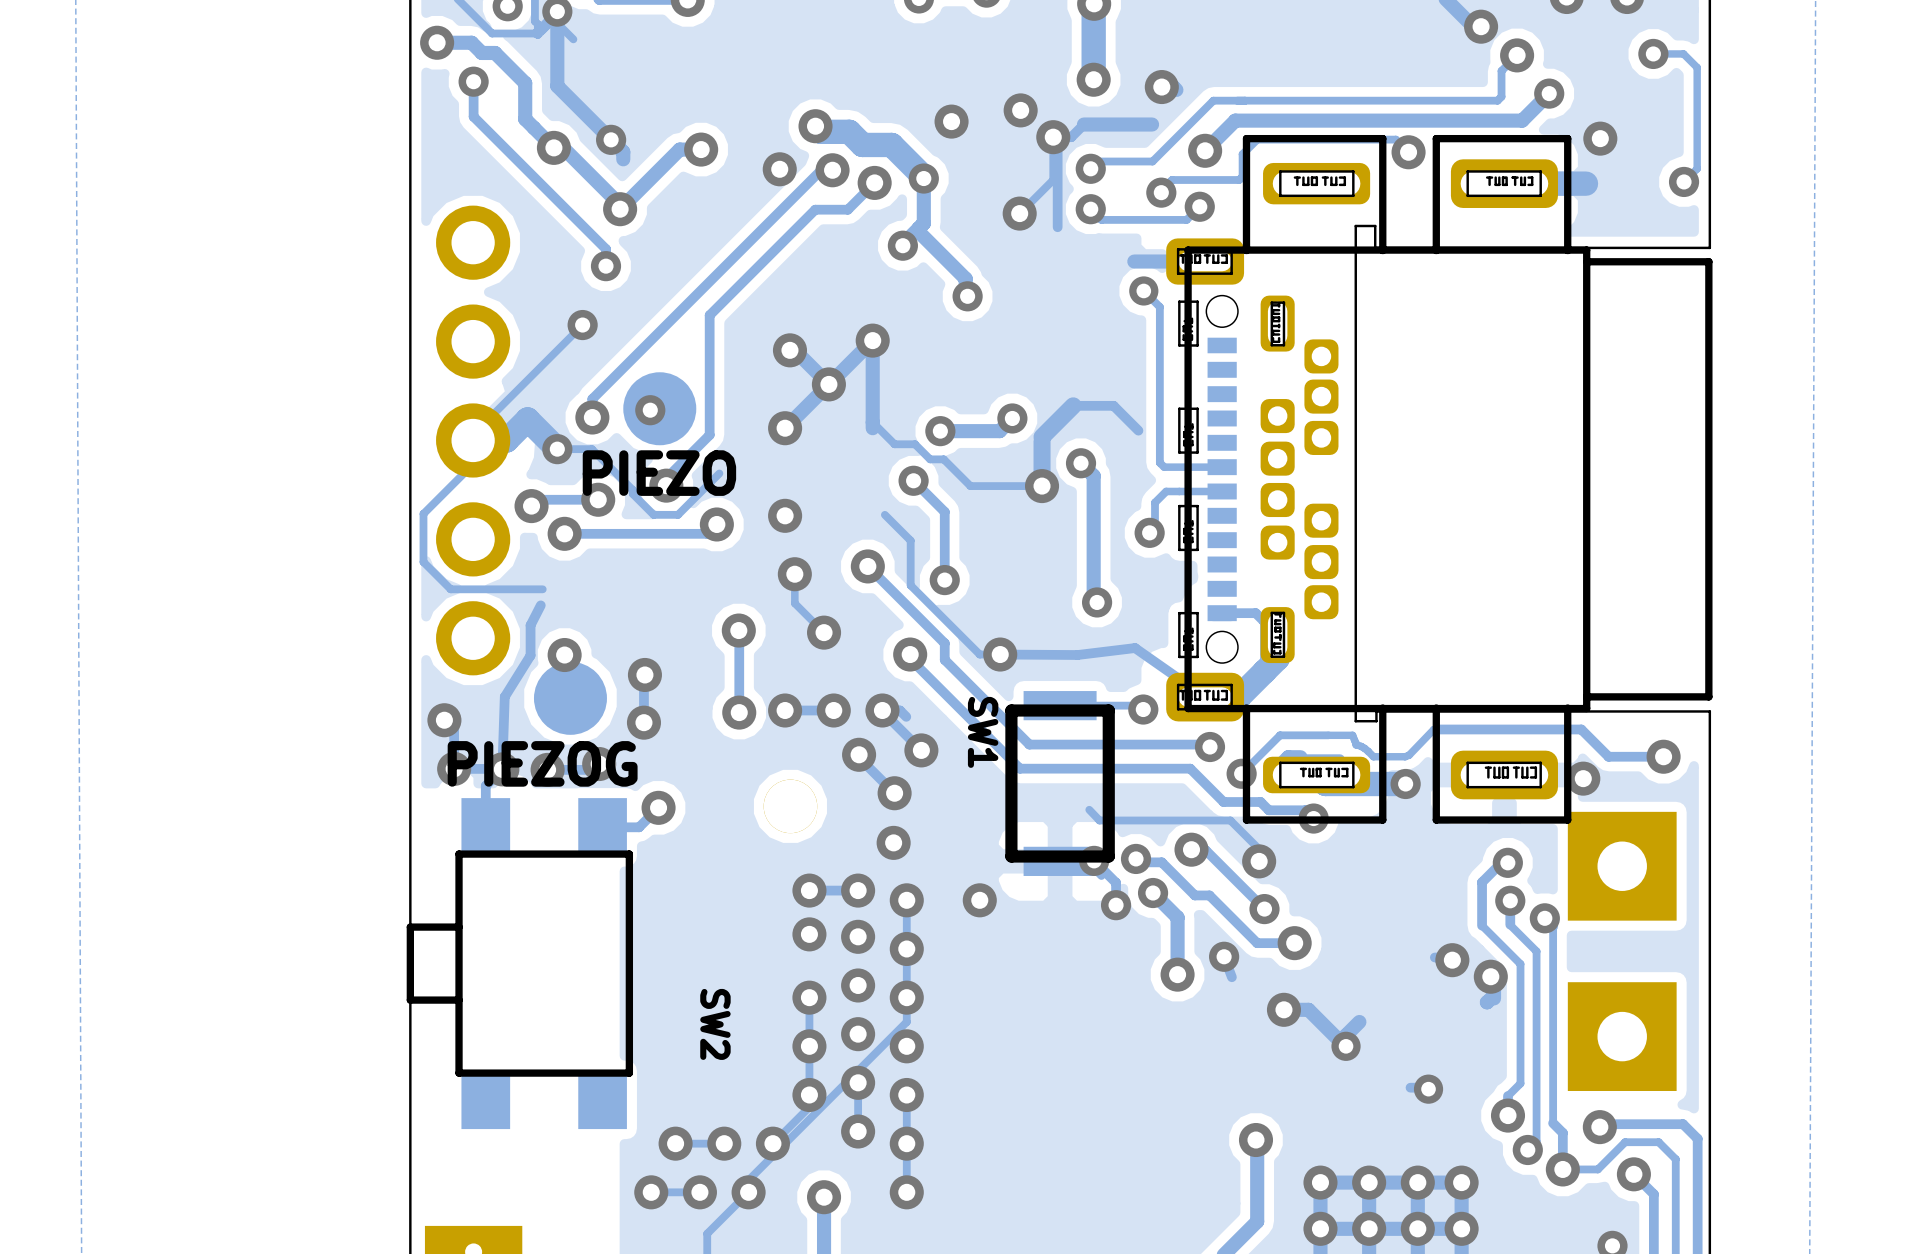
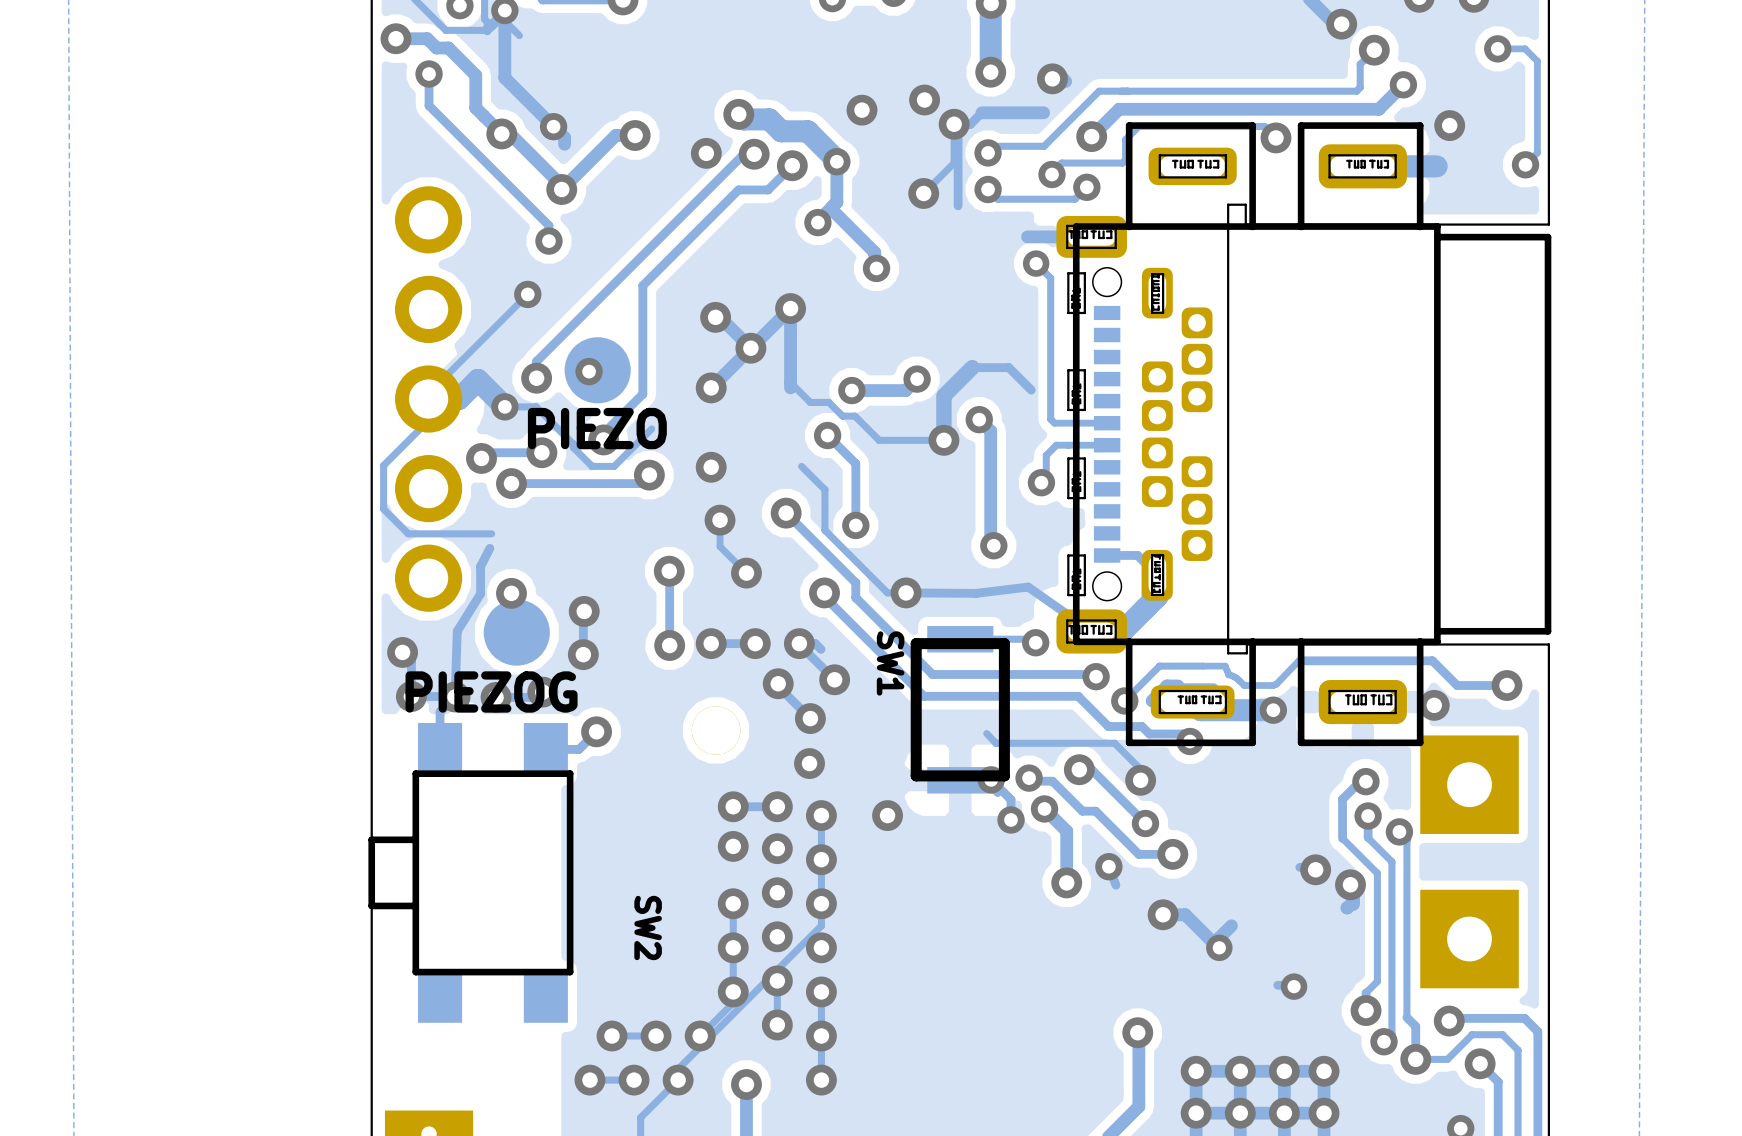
part footprint: [1166, 134, 1713, 824] -> [1056, 122, 1552, 747]

